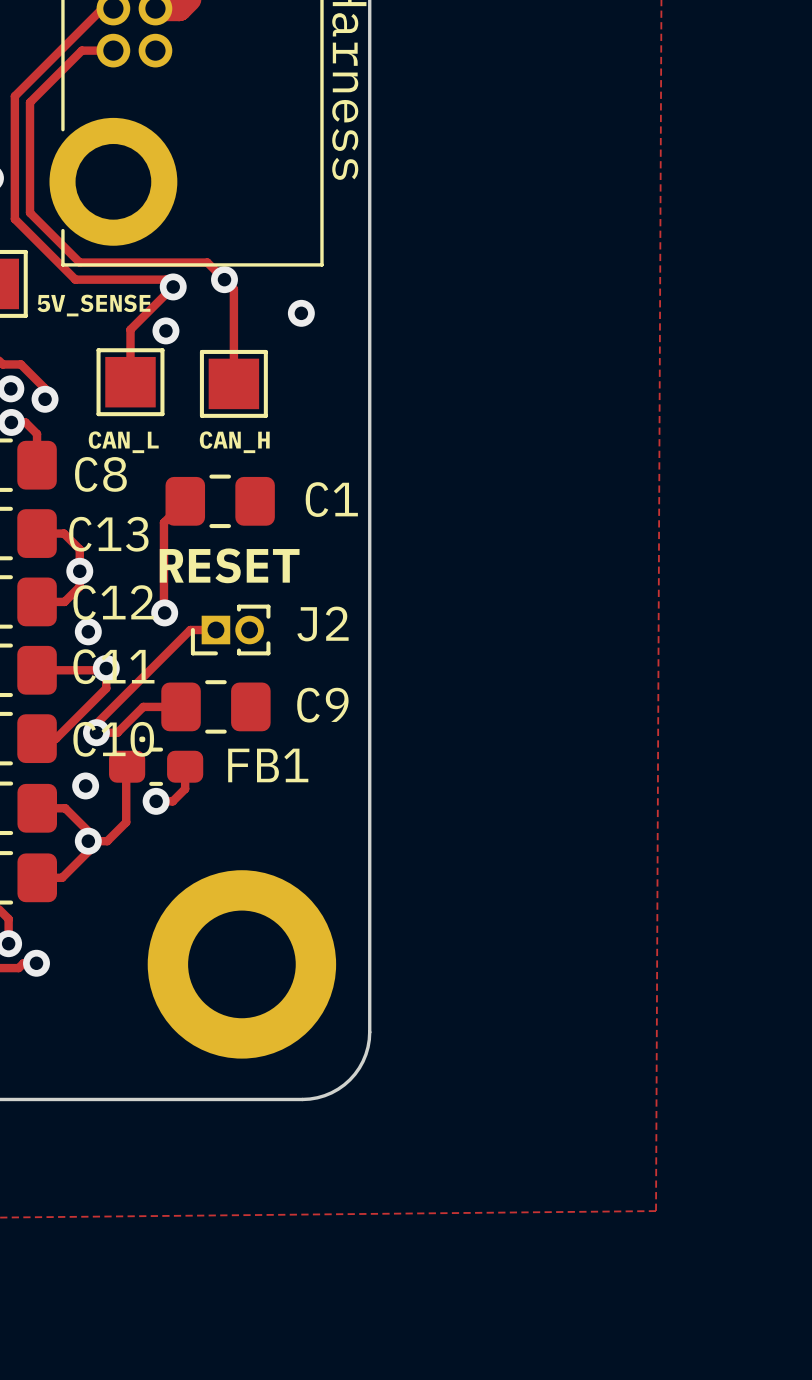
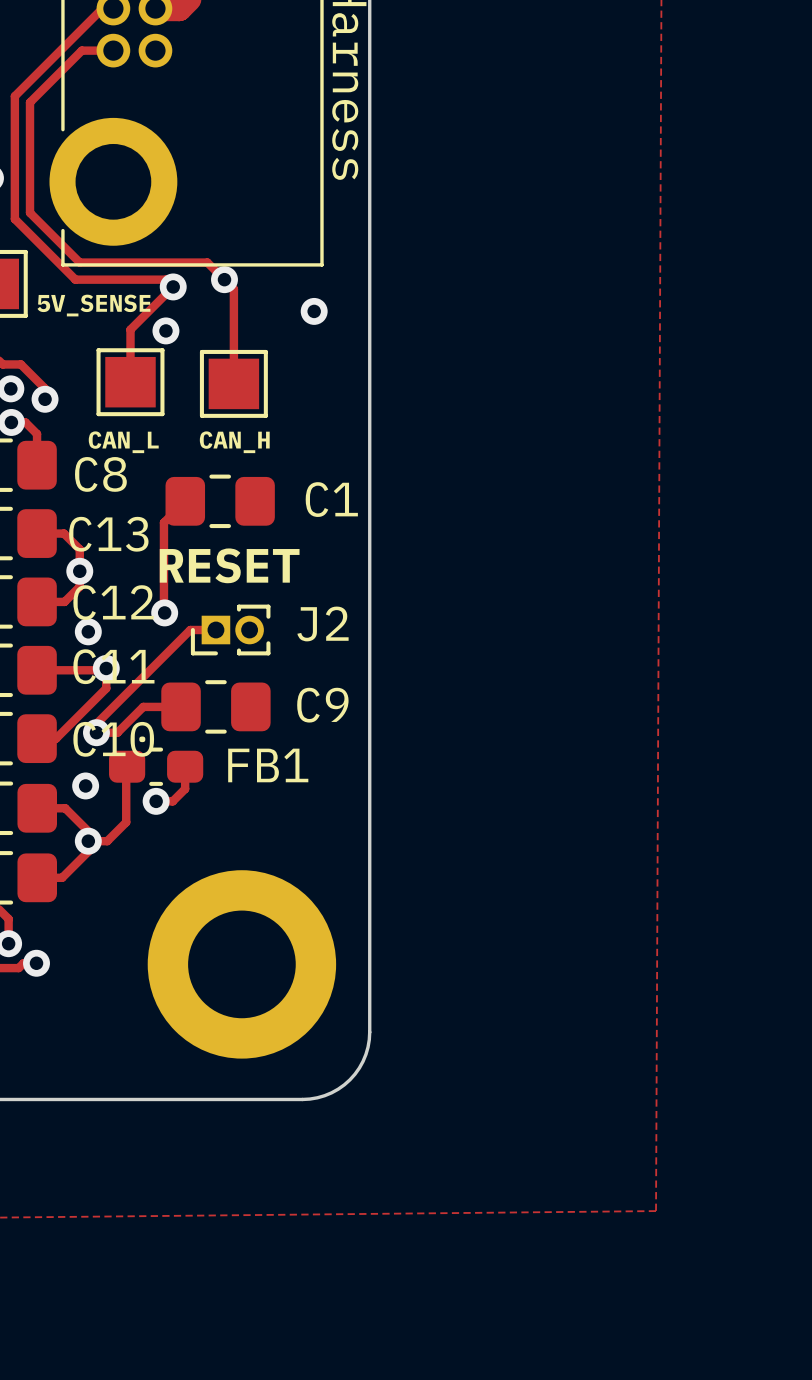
via position: (301, 313) -> (314, 311)

